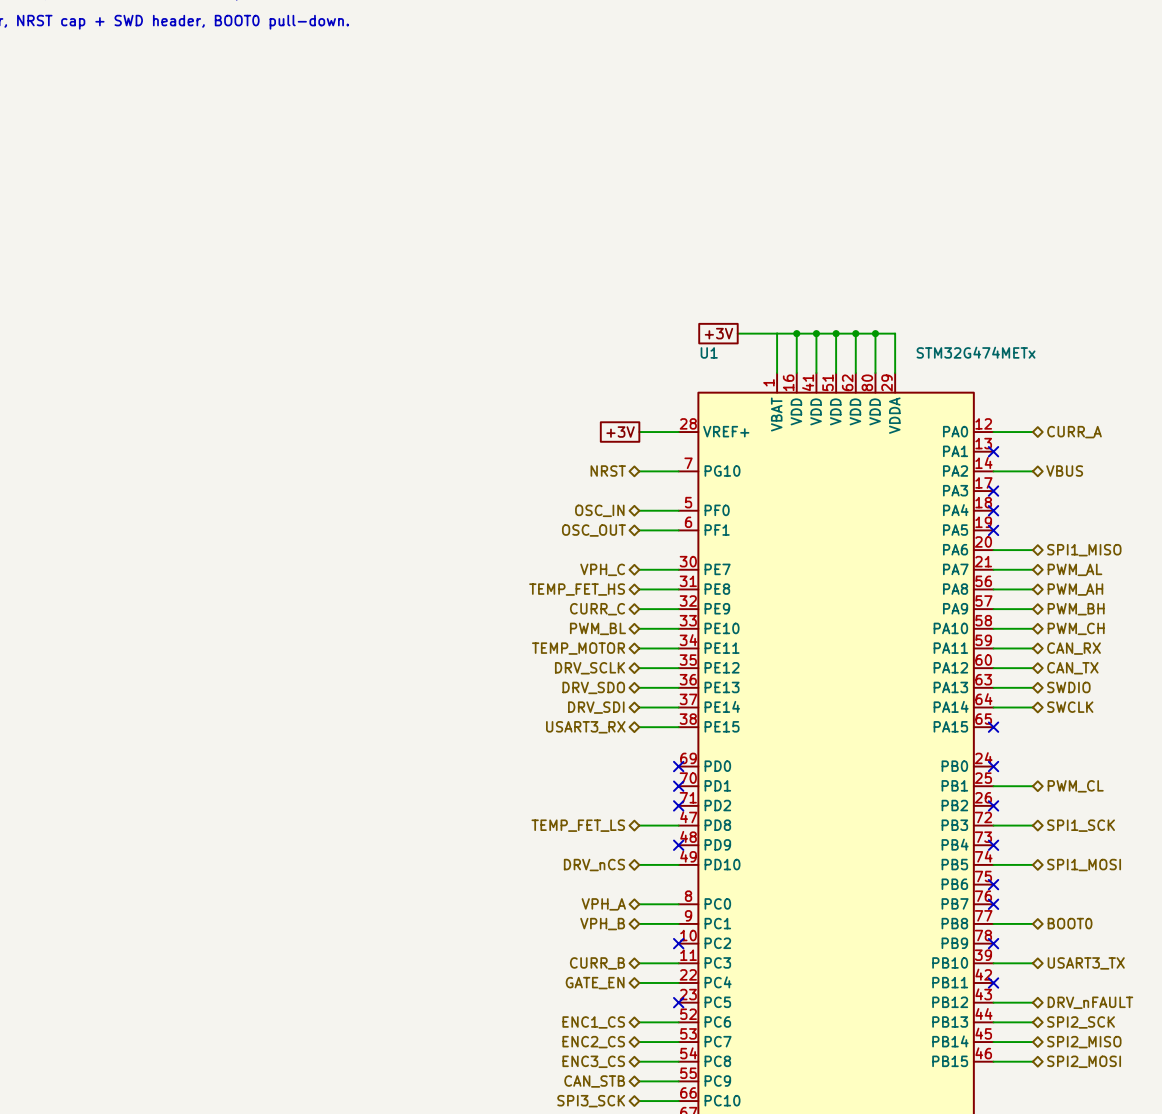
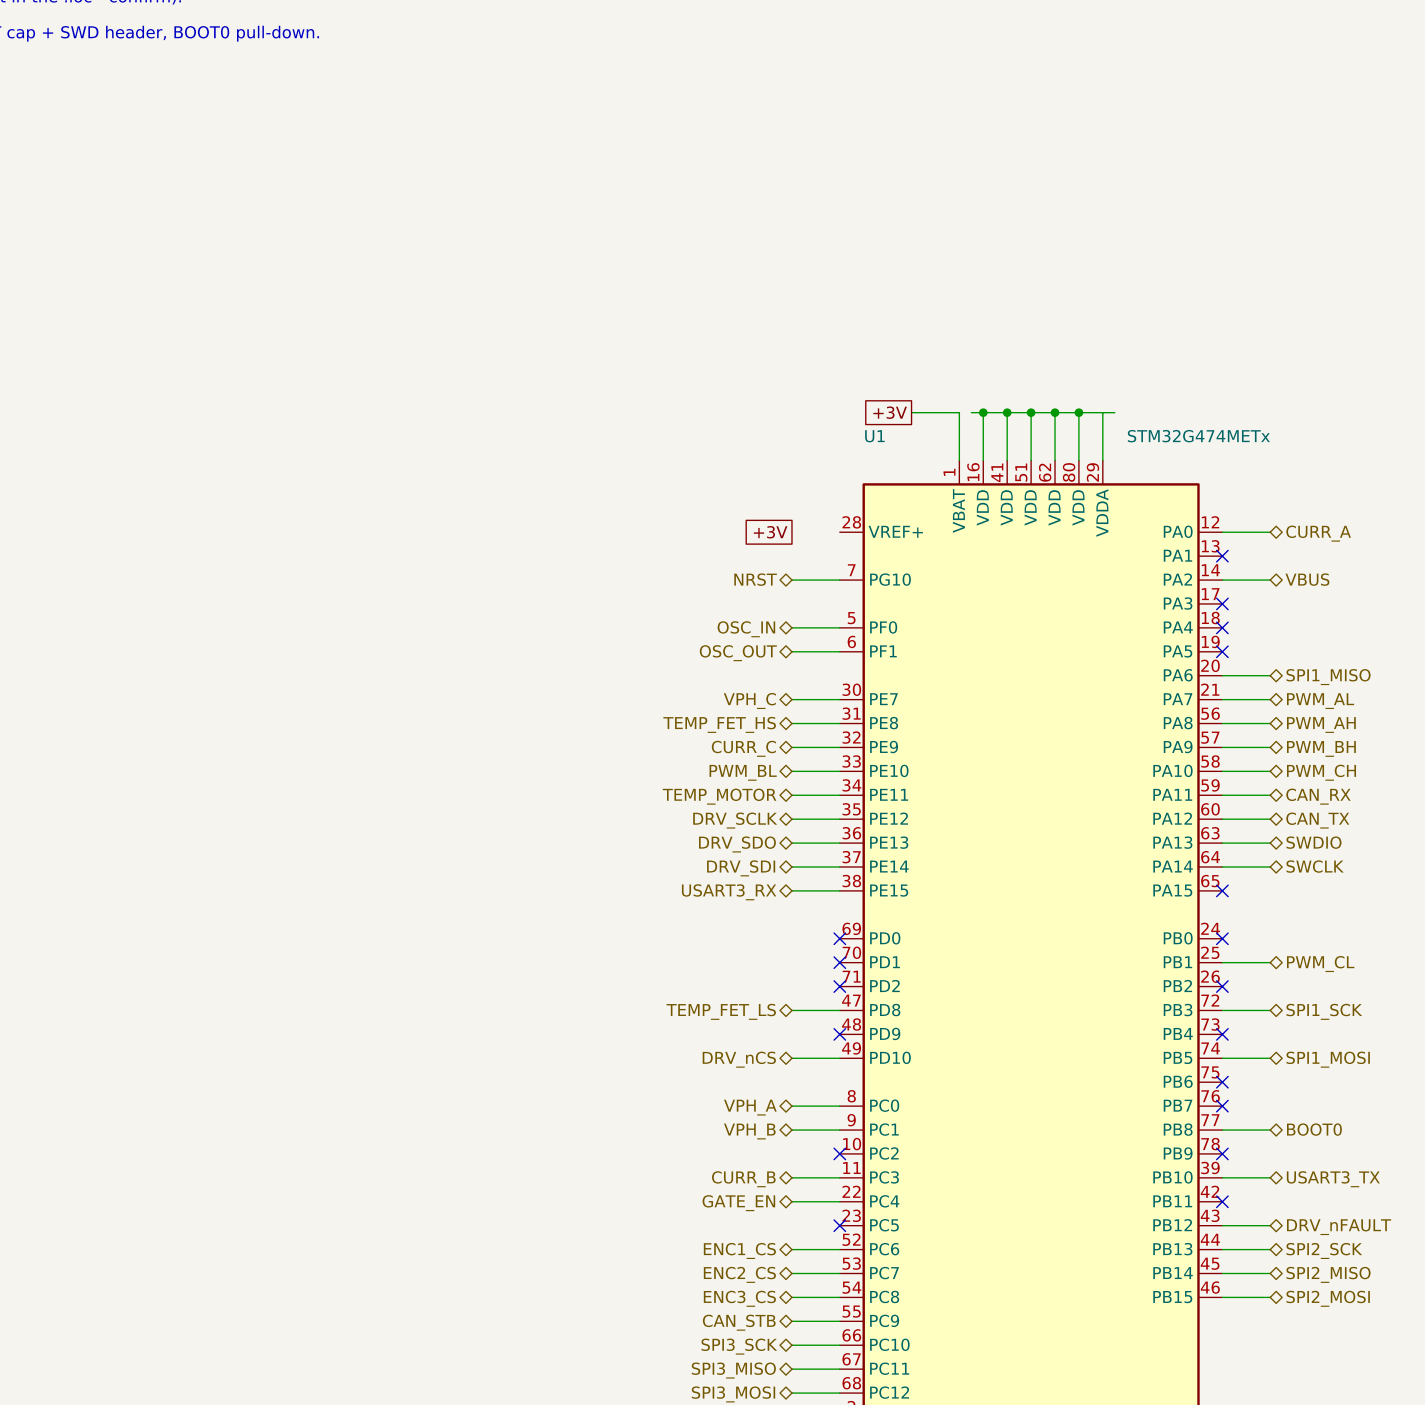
wire: (777, 333) (786, 333) -> (1102, 412) (1114, 412)
wire: (639, 432) (678, 432) -> none

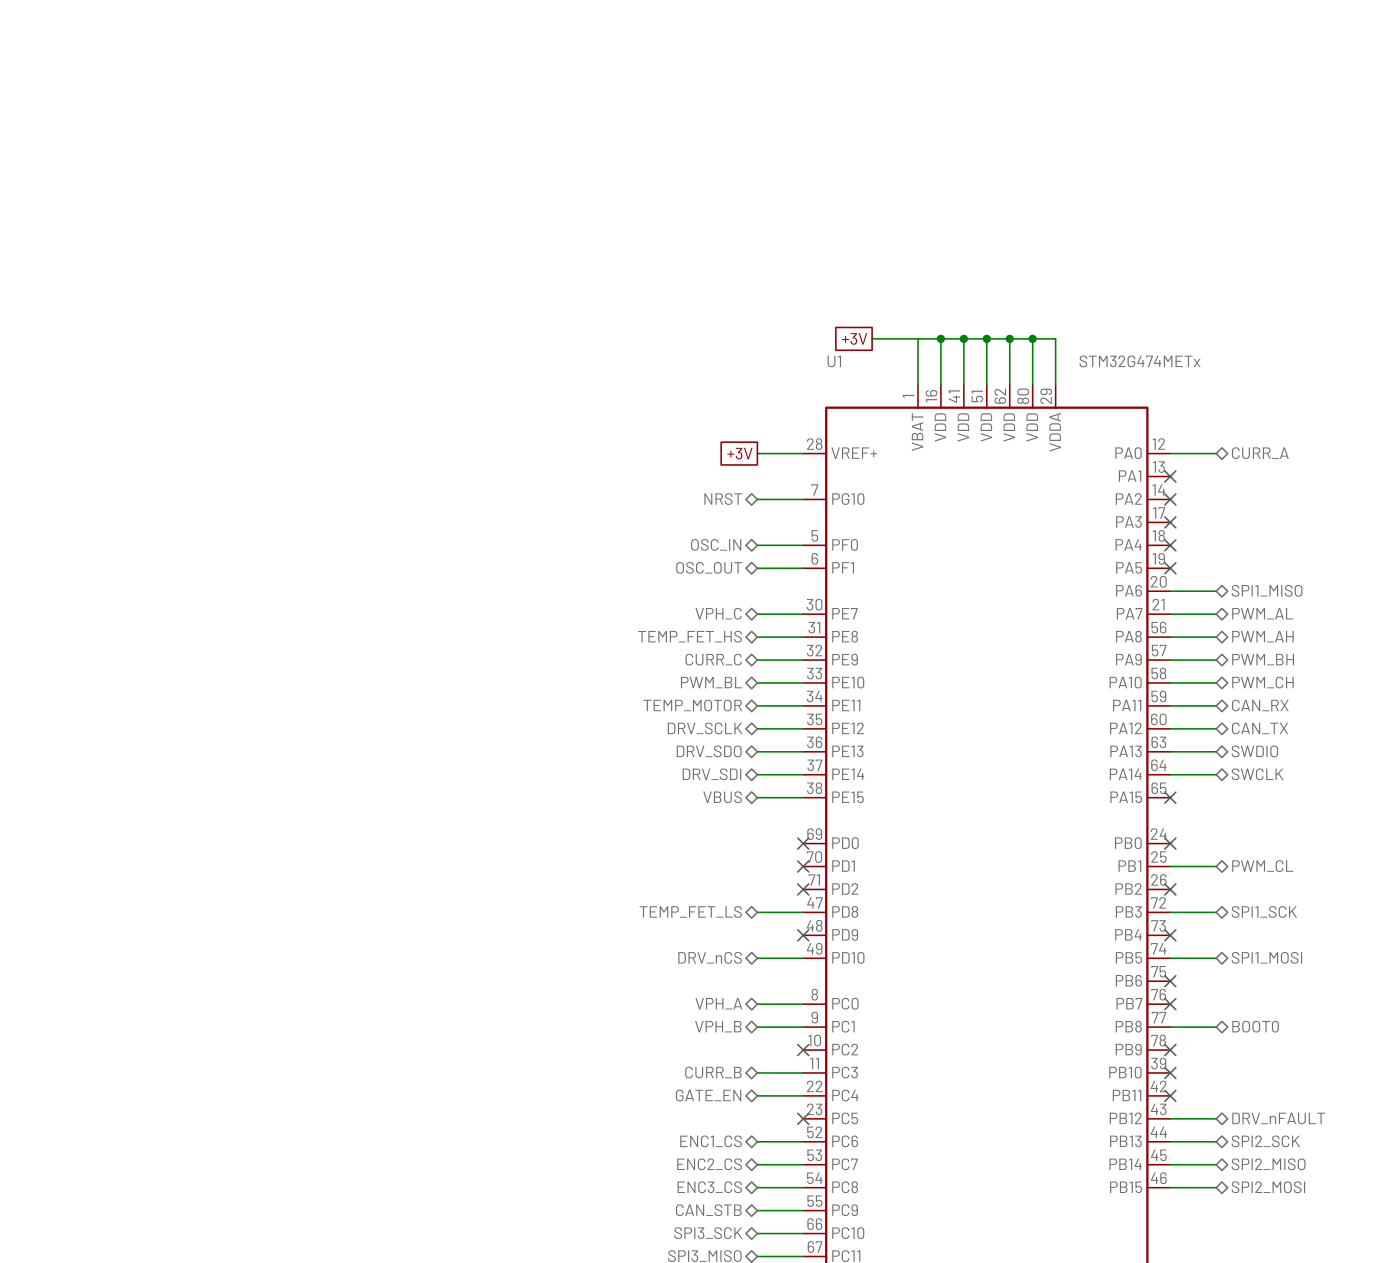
wire: (1102, 412) (1114, 412) -> (917, 338) (929, 338)
wire: none -> (757, 453) (803, 453)
hierarchical label: VBUS (1307, 579) -> none
wire: (1222, 580) (1270, 580) -> none
no-connect mark: none -> (1170, 499)
hierarchical label: USART3_RX (729, 892) -> VBUS (722, 797)
wire: (1222, 1177) (1270, 1177) -> none
no-connect mark: none -> (1170, 1072)
hierarchical label: USART3_TX (1333, 1179) -> none

